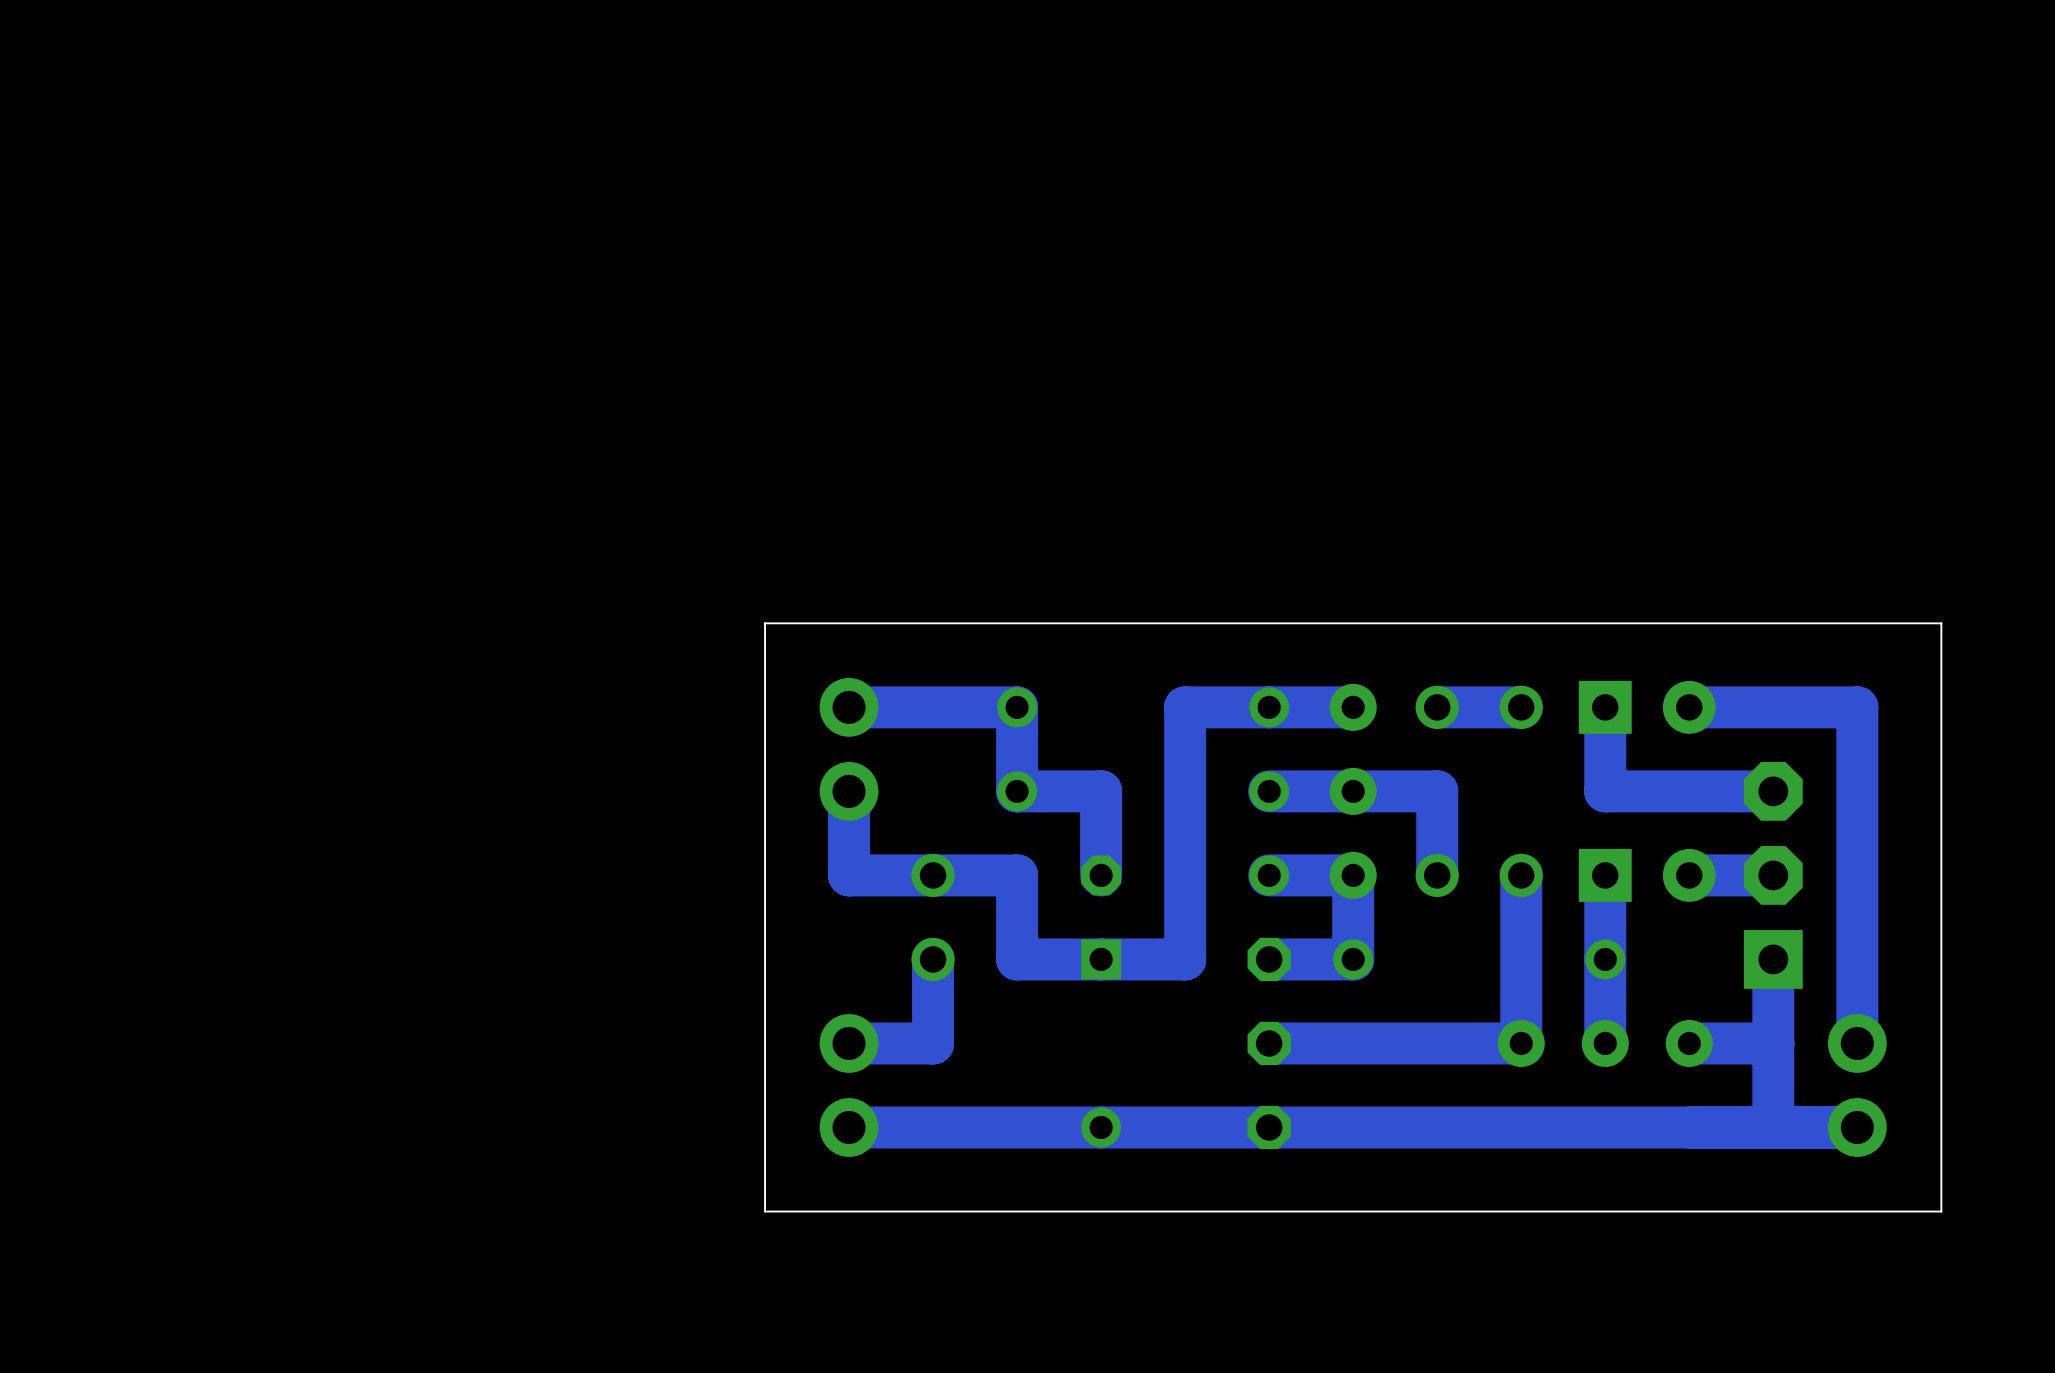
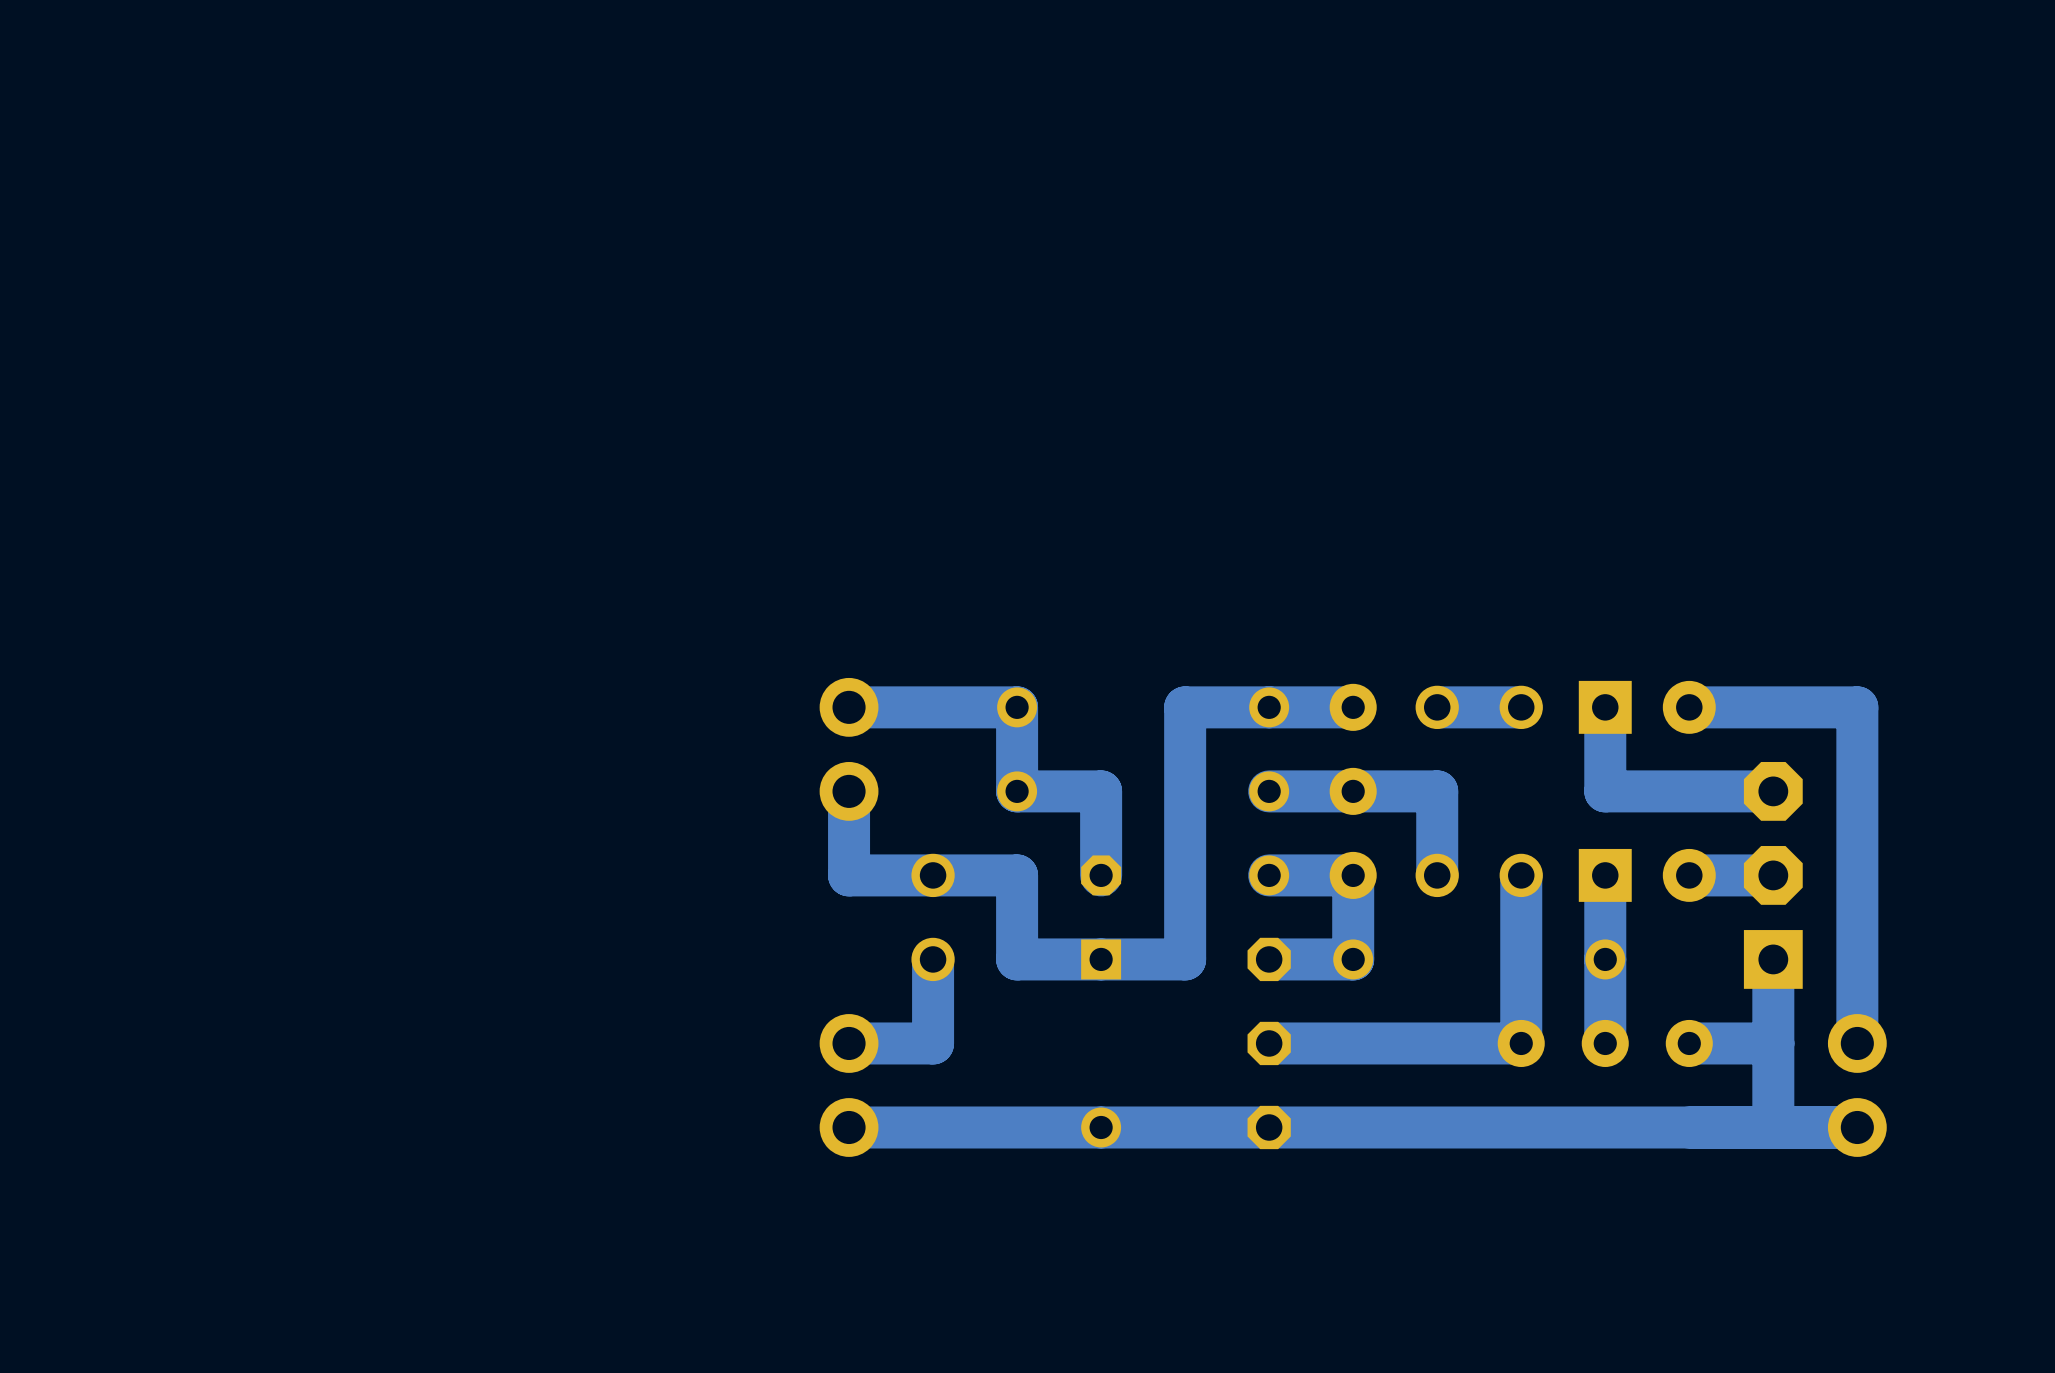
board edge: (1941, 623) (765, 623) (765, 1211) (1941, 1211) (1941, 623) -> none

